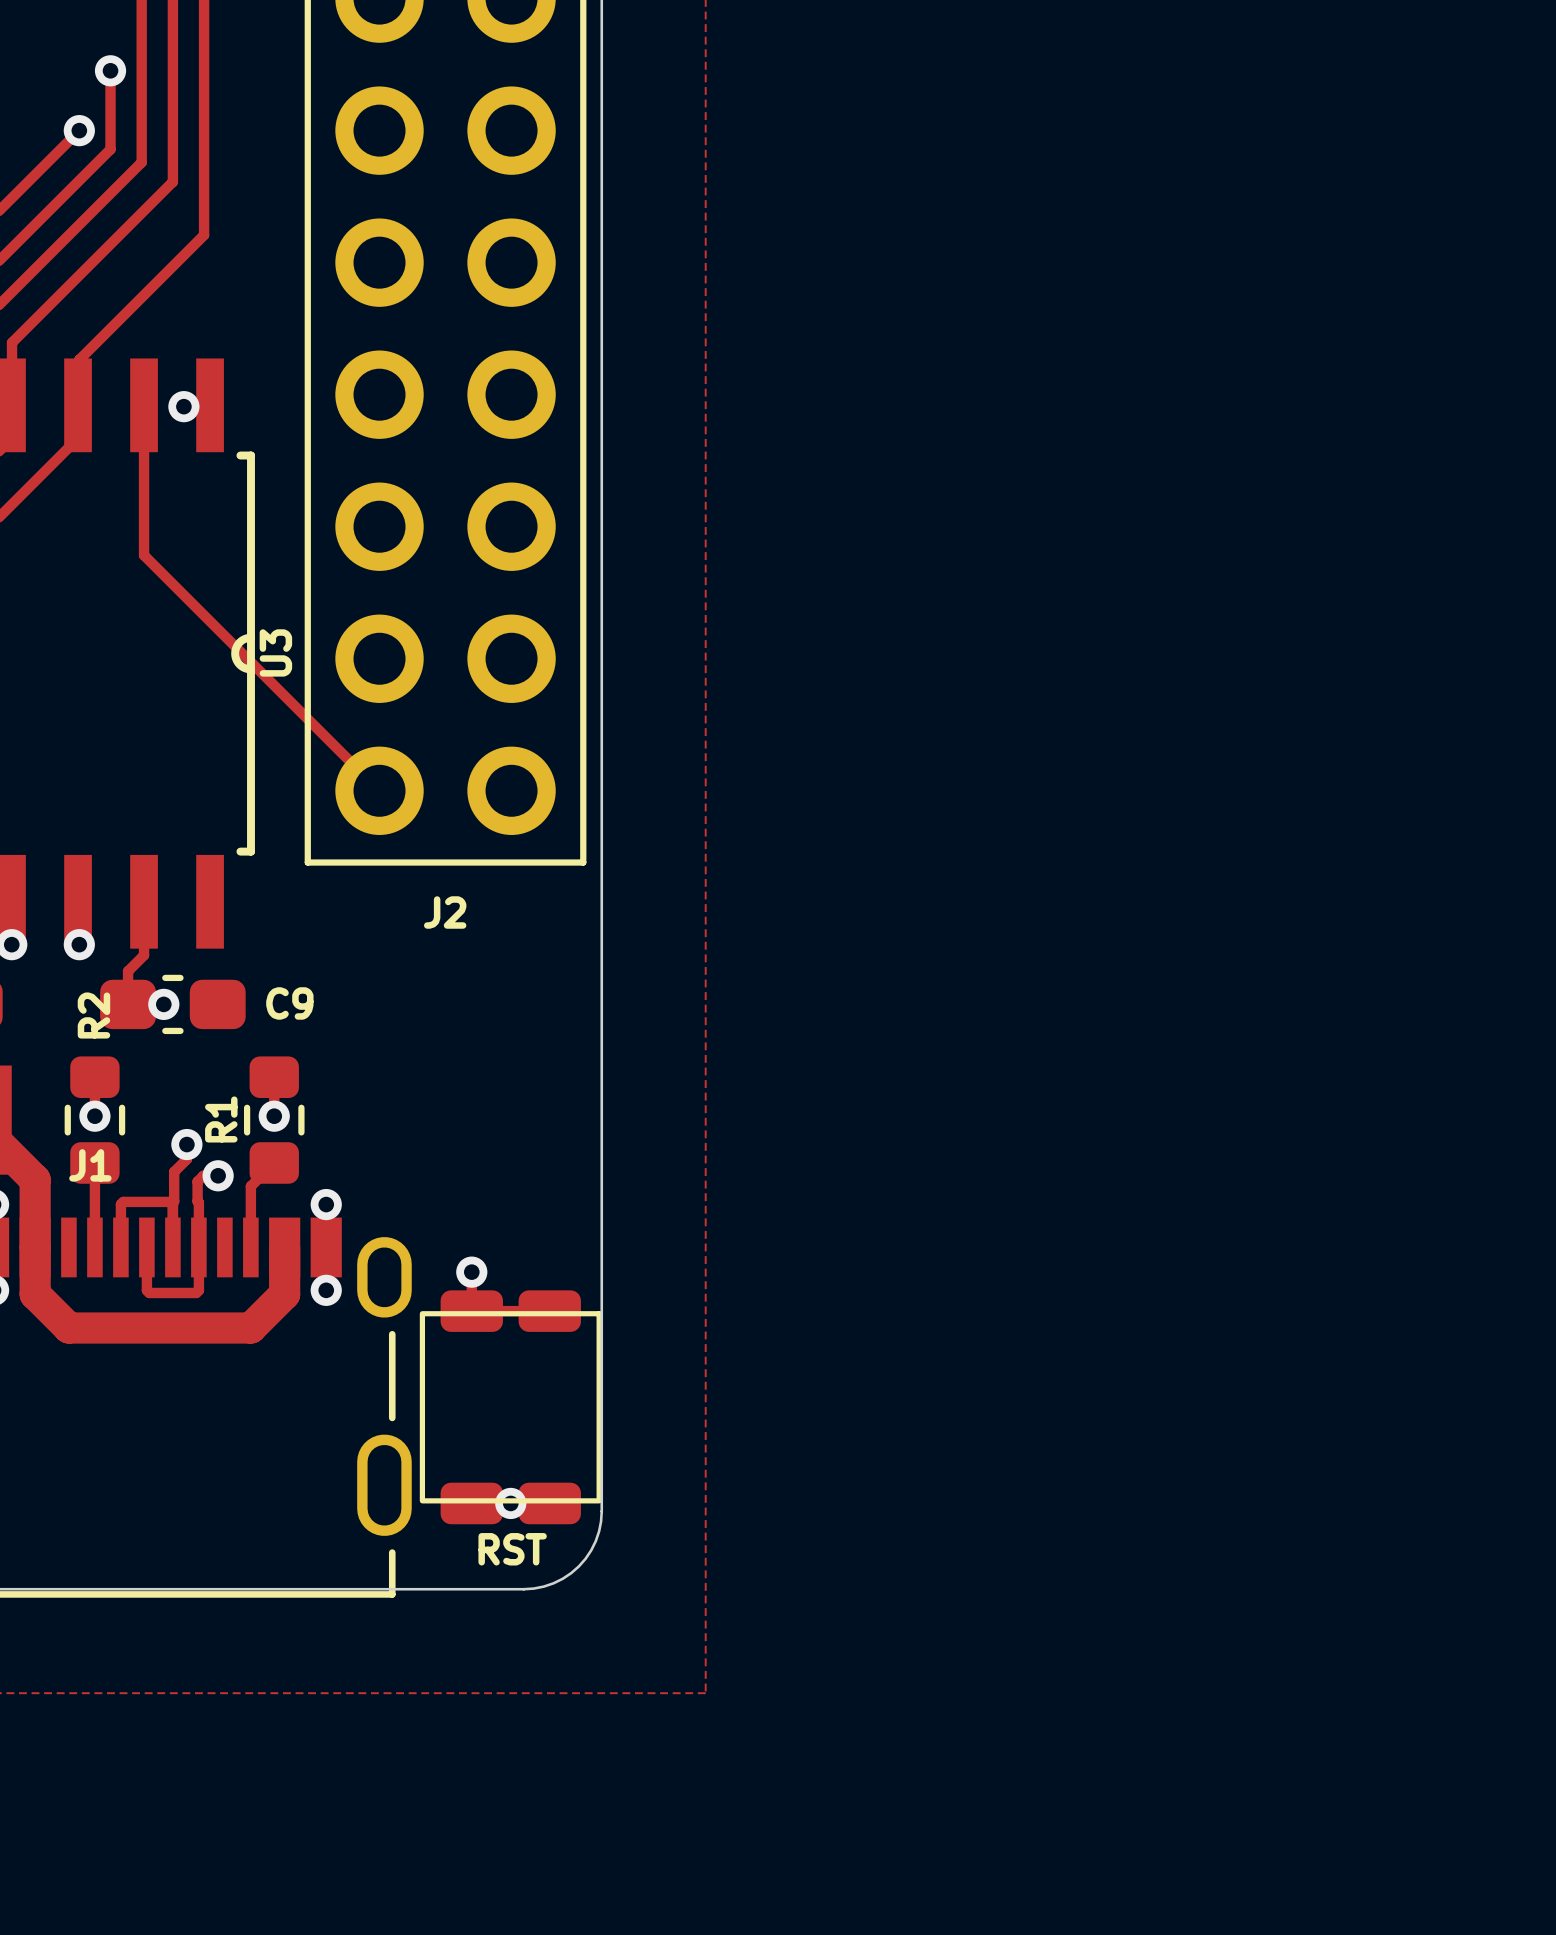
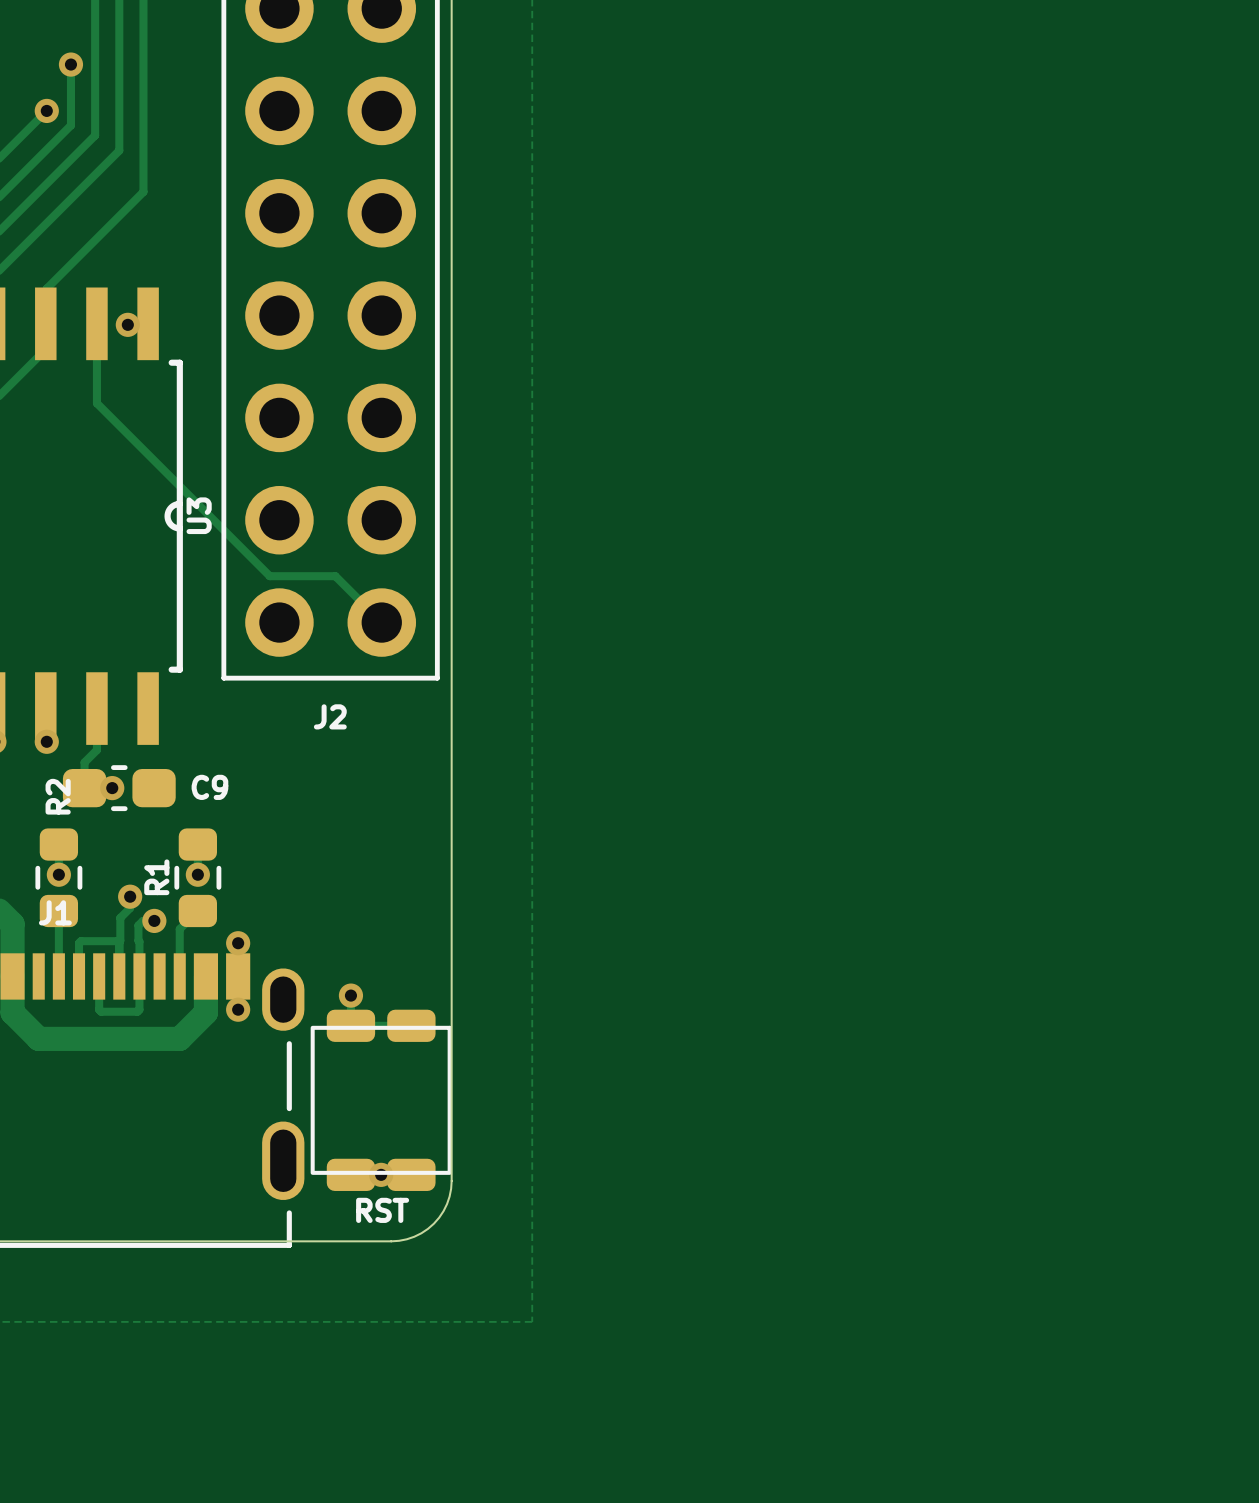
track: (144, 507) (144, 555) (379, 790) -> (96, 403) (269, 576) (335, 576) (381, 622)

